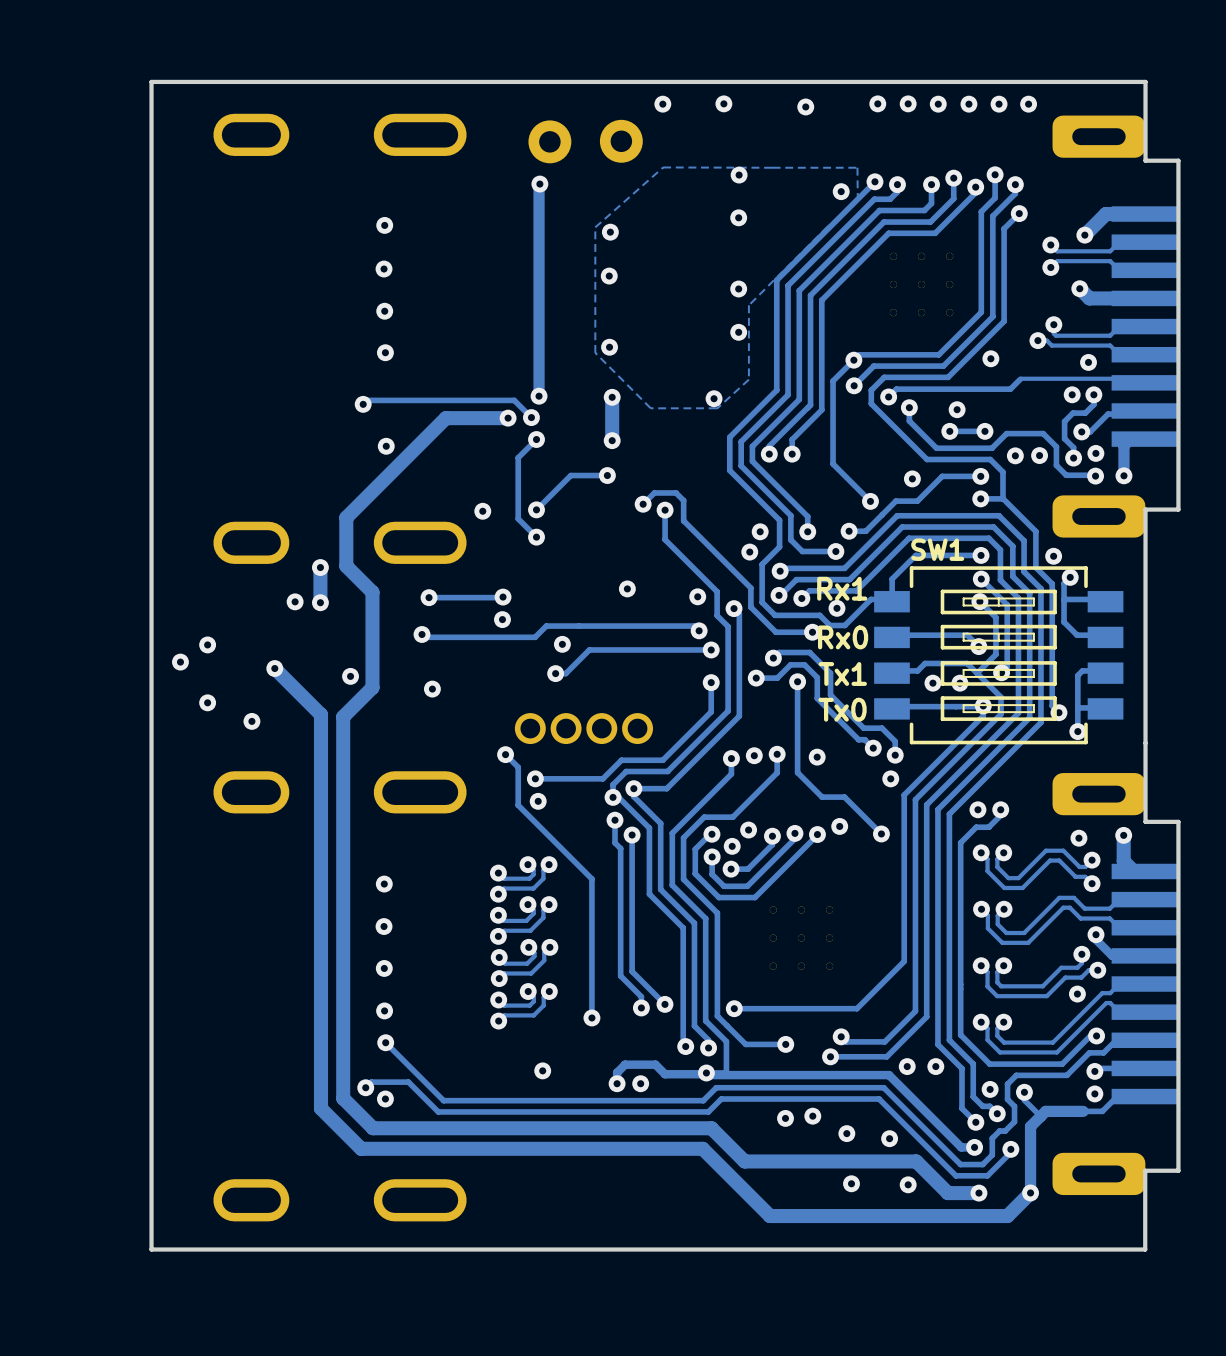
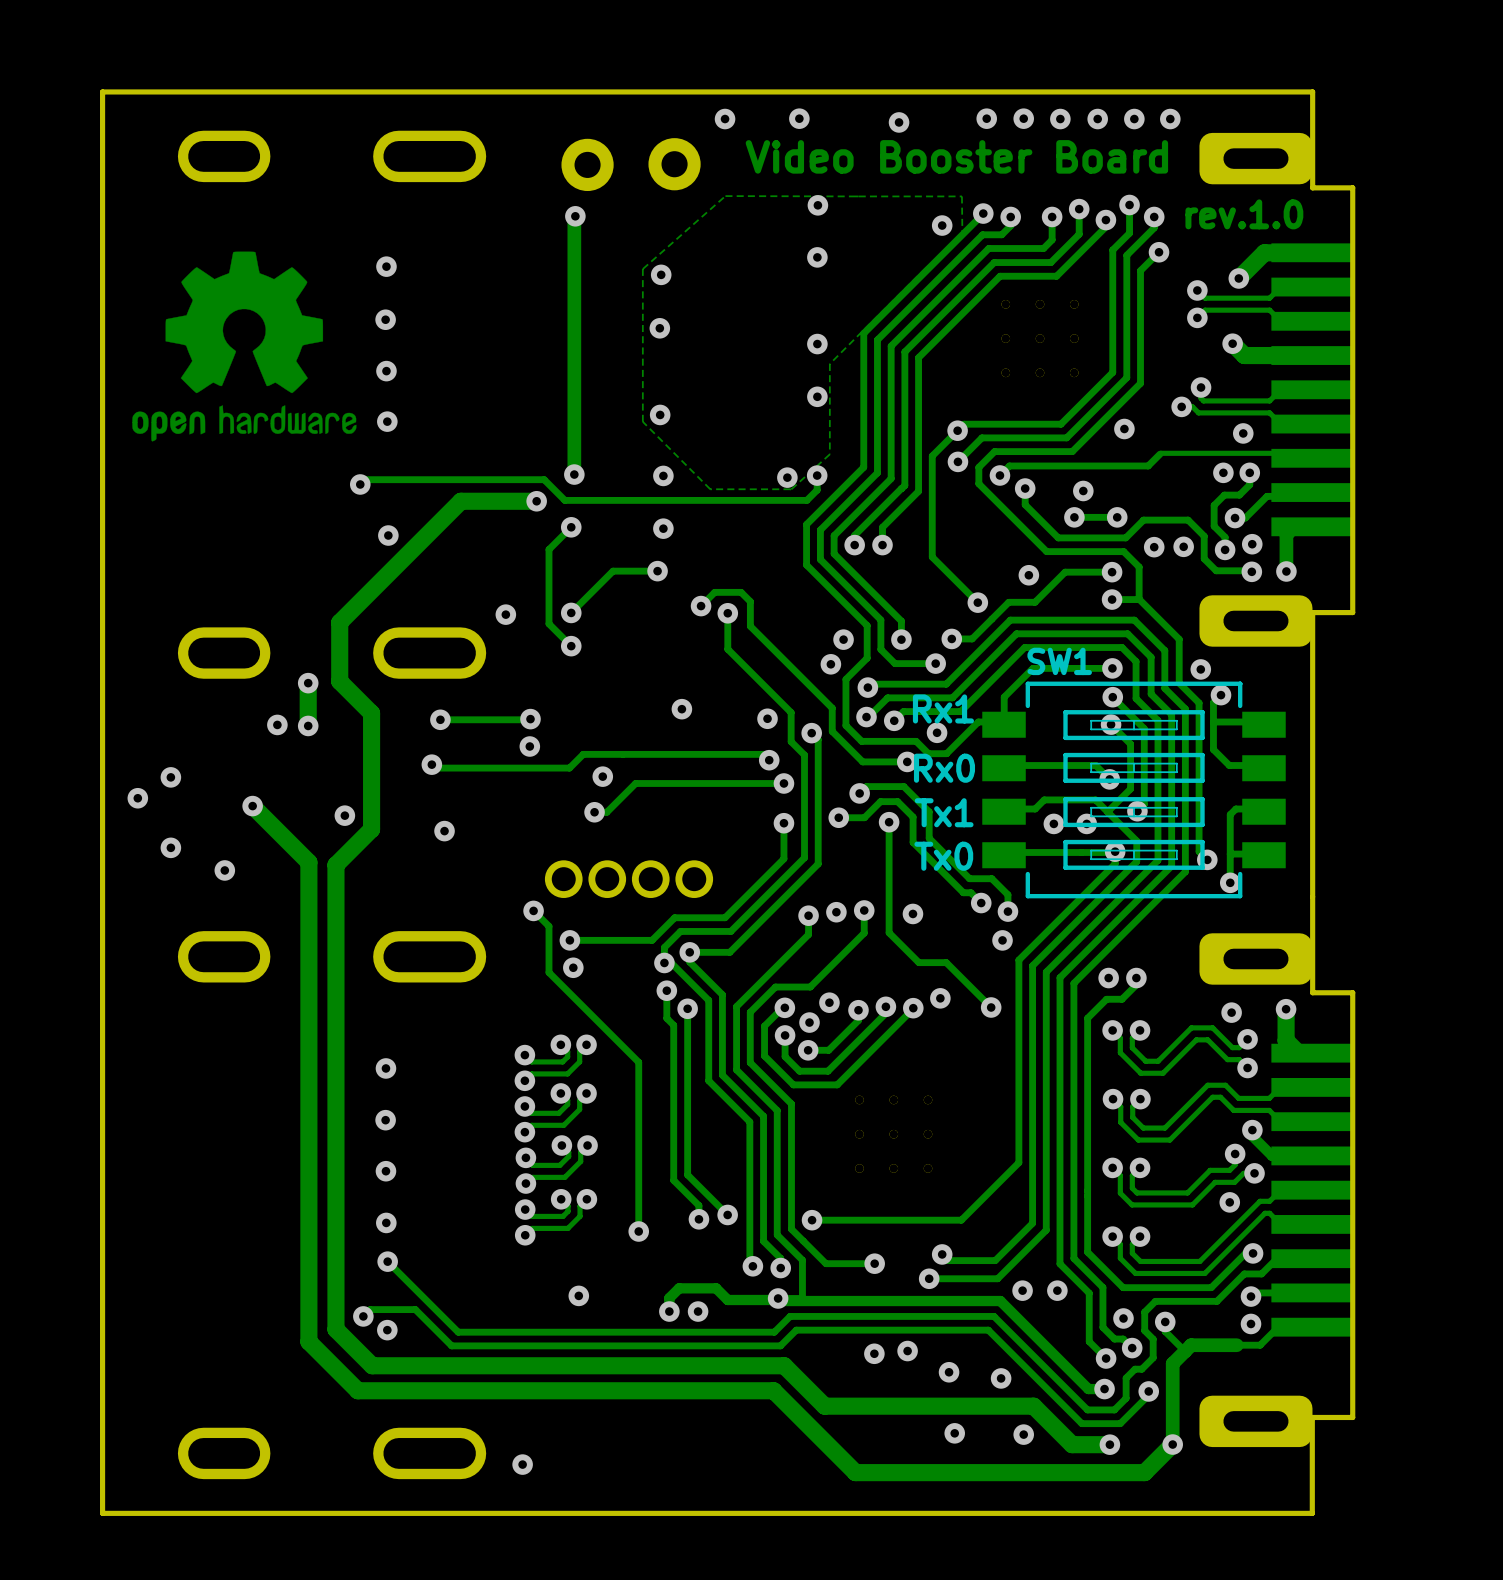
text: none -> Video Booster Board (956, 156)
text: none -> rev.1.0 (1244, 214)
drawing: none -> [132, 251, 357, 442]
track: (612, 397) (612, 440) -> none
track: none -> (817, 475) (817, 490) (806, 500) (564, 500)
via: none -> (817, 475)
via: (531, 417) -> none
via: none -> (522, 1464)

